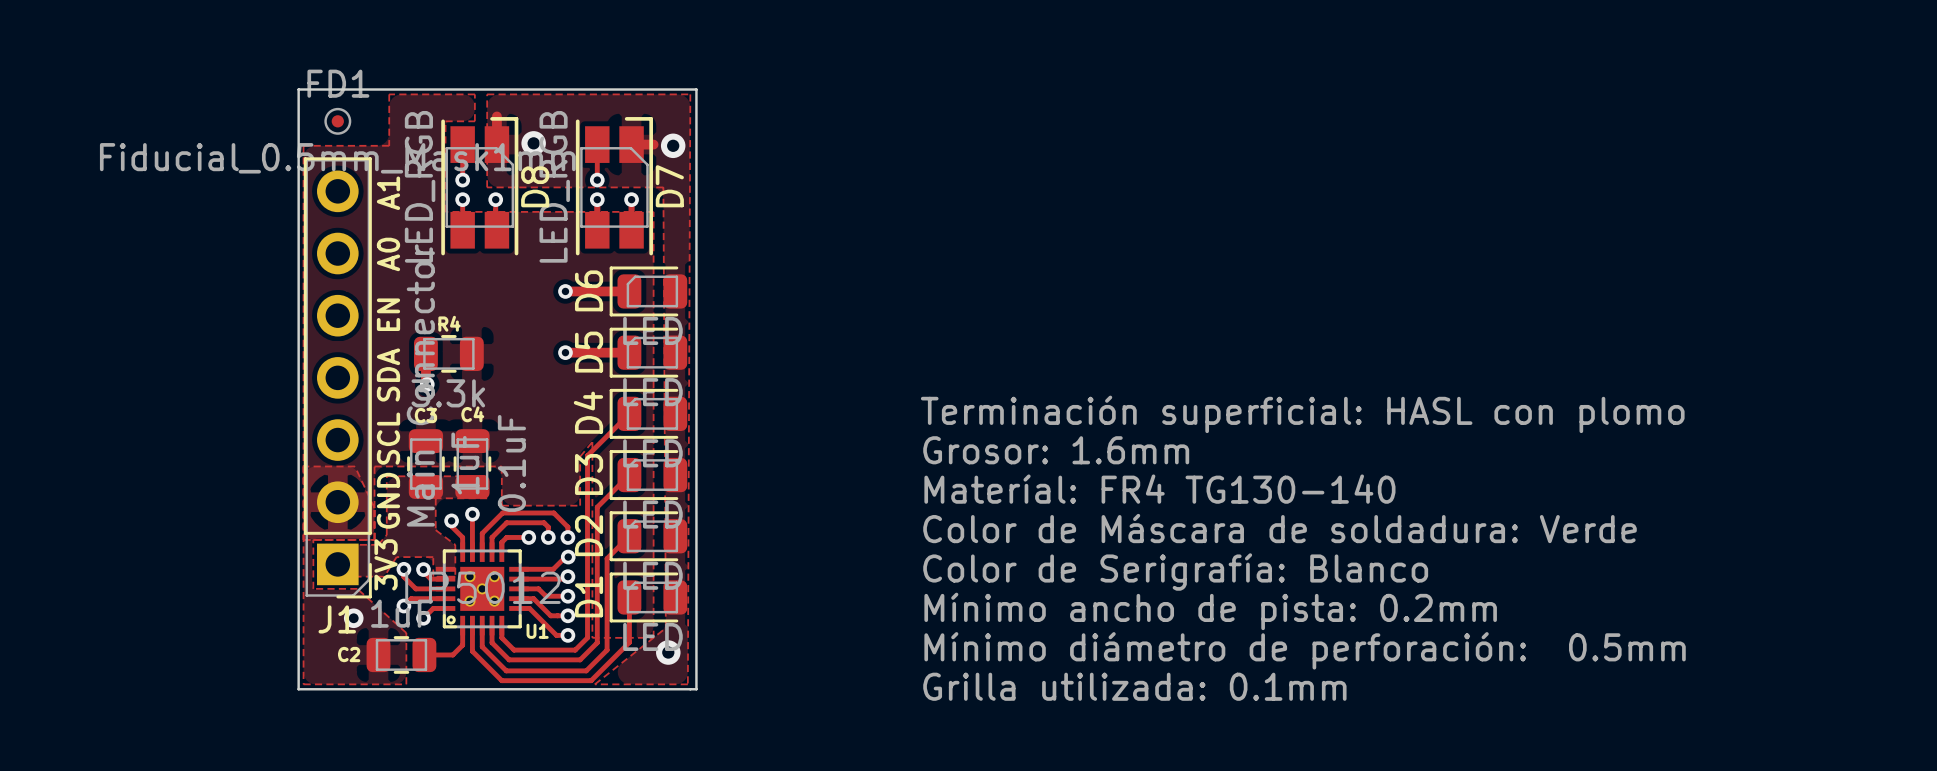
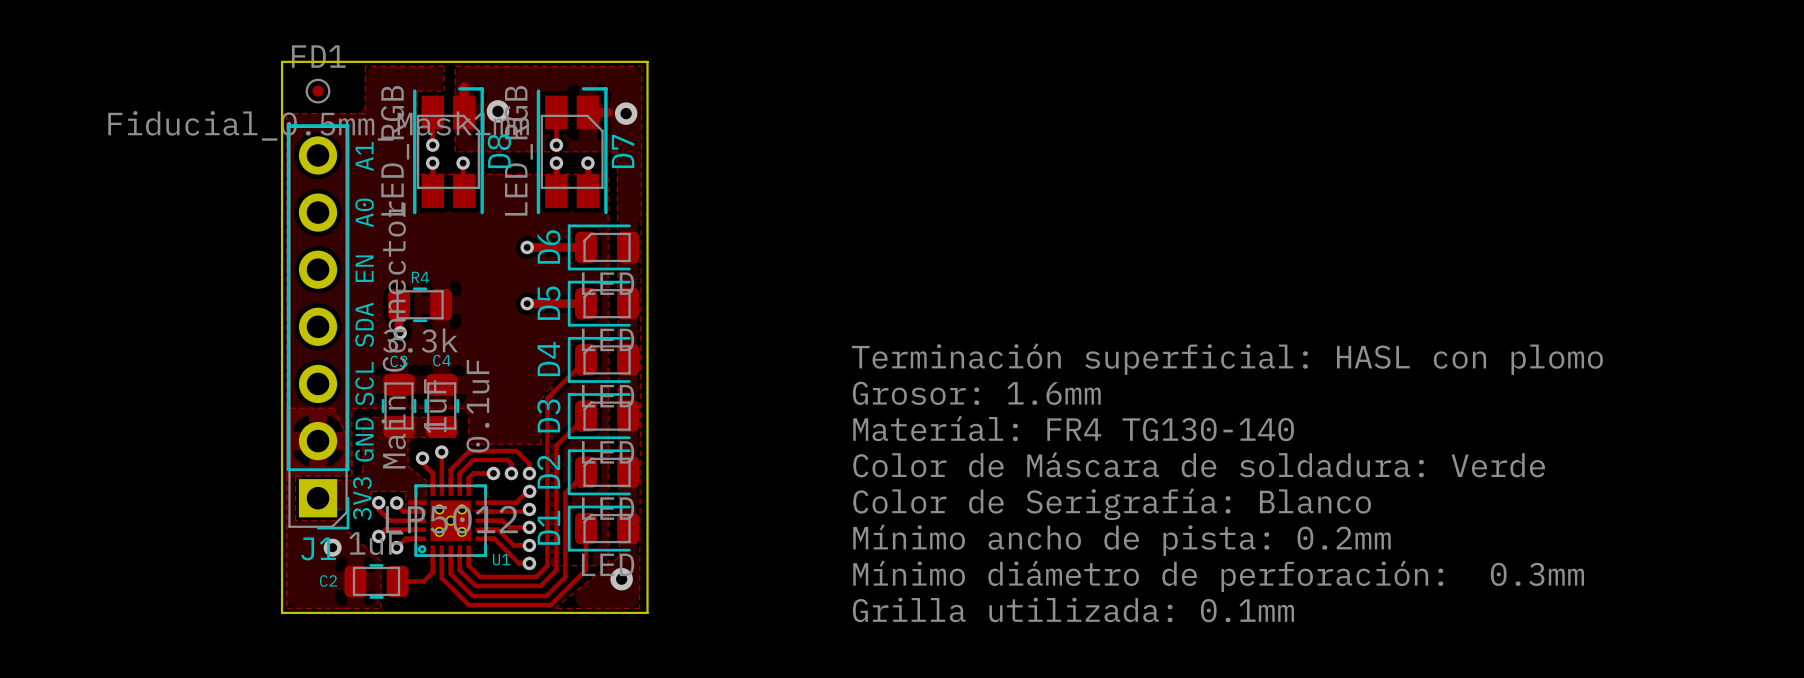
text: Mínimo diámetro de perforación: 0.5mm (1305, 650) -> Mínimo diámetro de perforación: 0.3mm (1218, 576)

